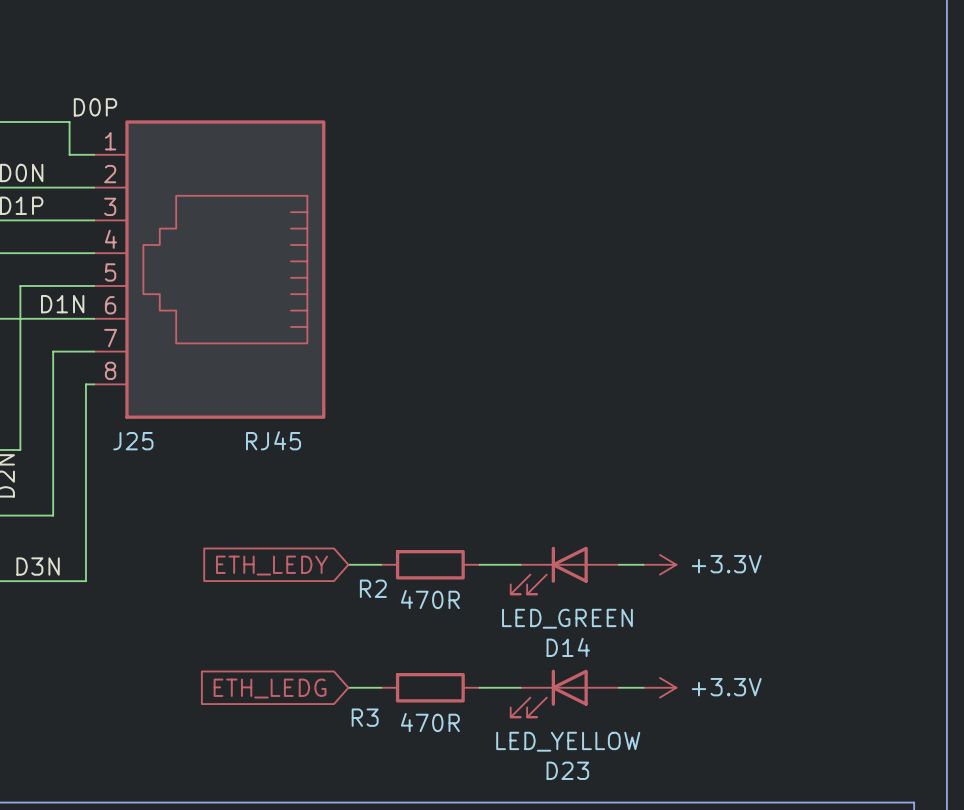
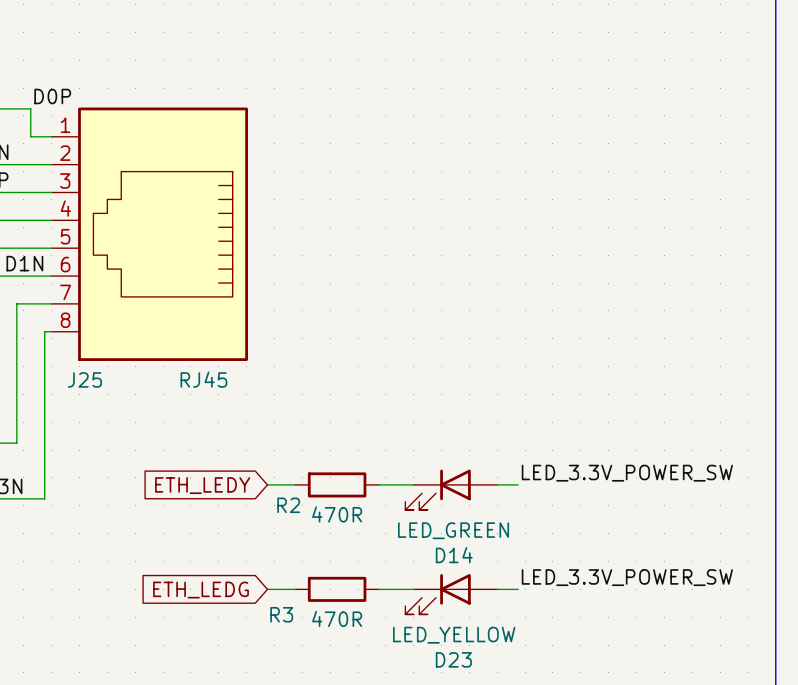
label: none -> LED_3.3V_POWER_SW (627, 473)
power symbol: +3.3V (659, 564) -> none
label: none -> LED_3.3V_POWER_SW (627, 577)
power symbol: +3.3V (659, 687) -> none

